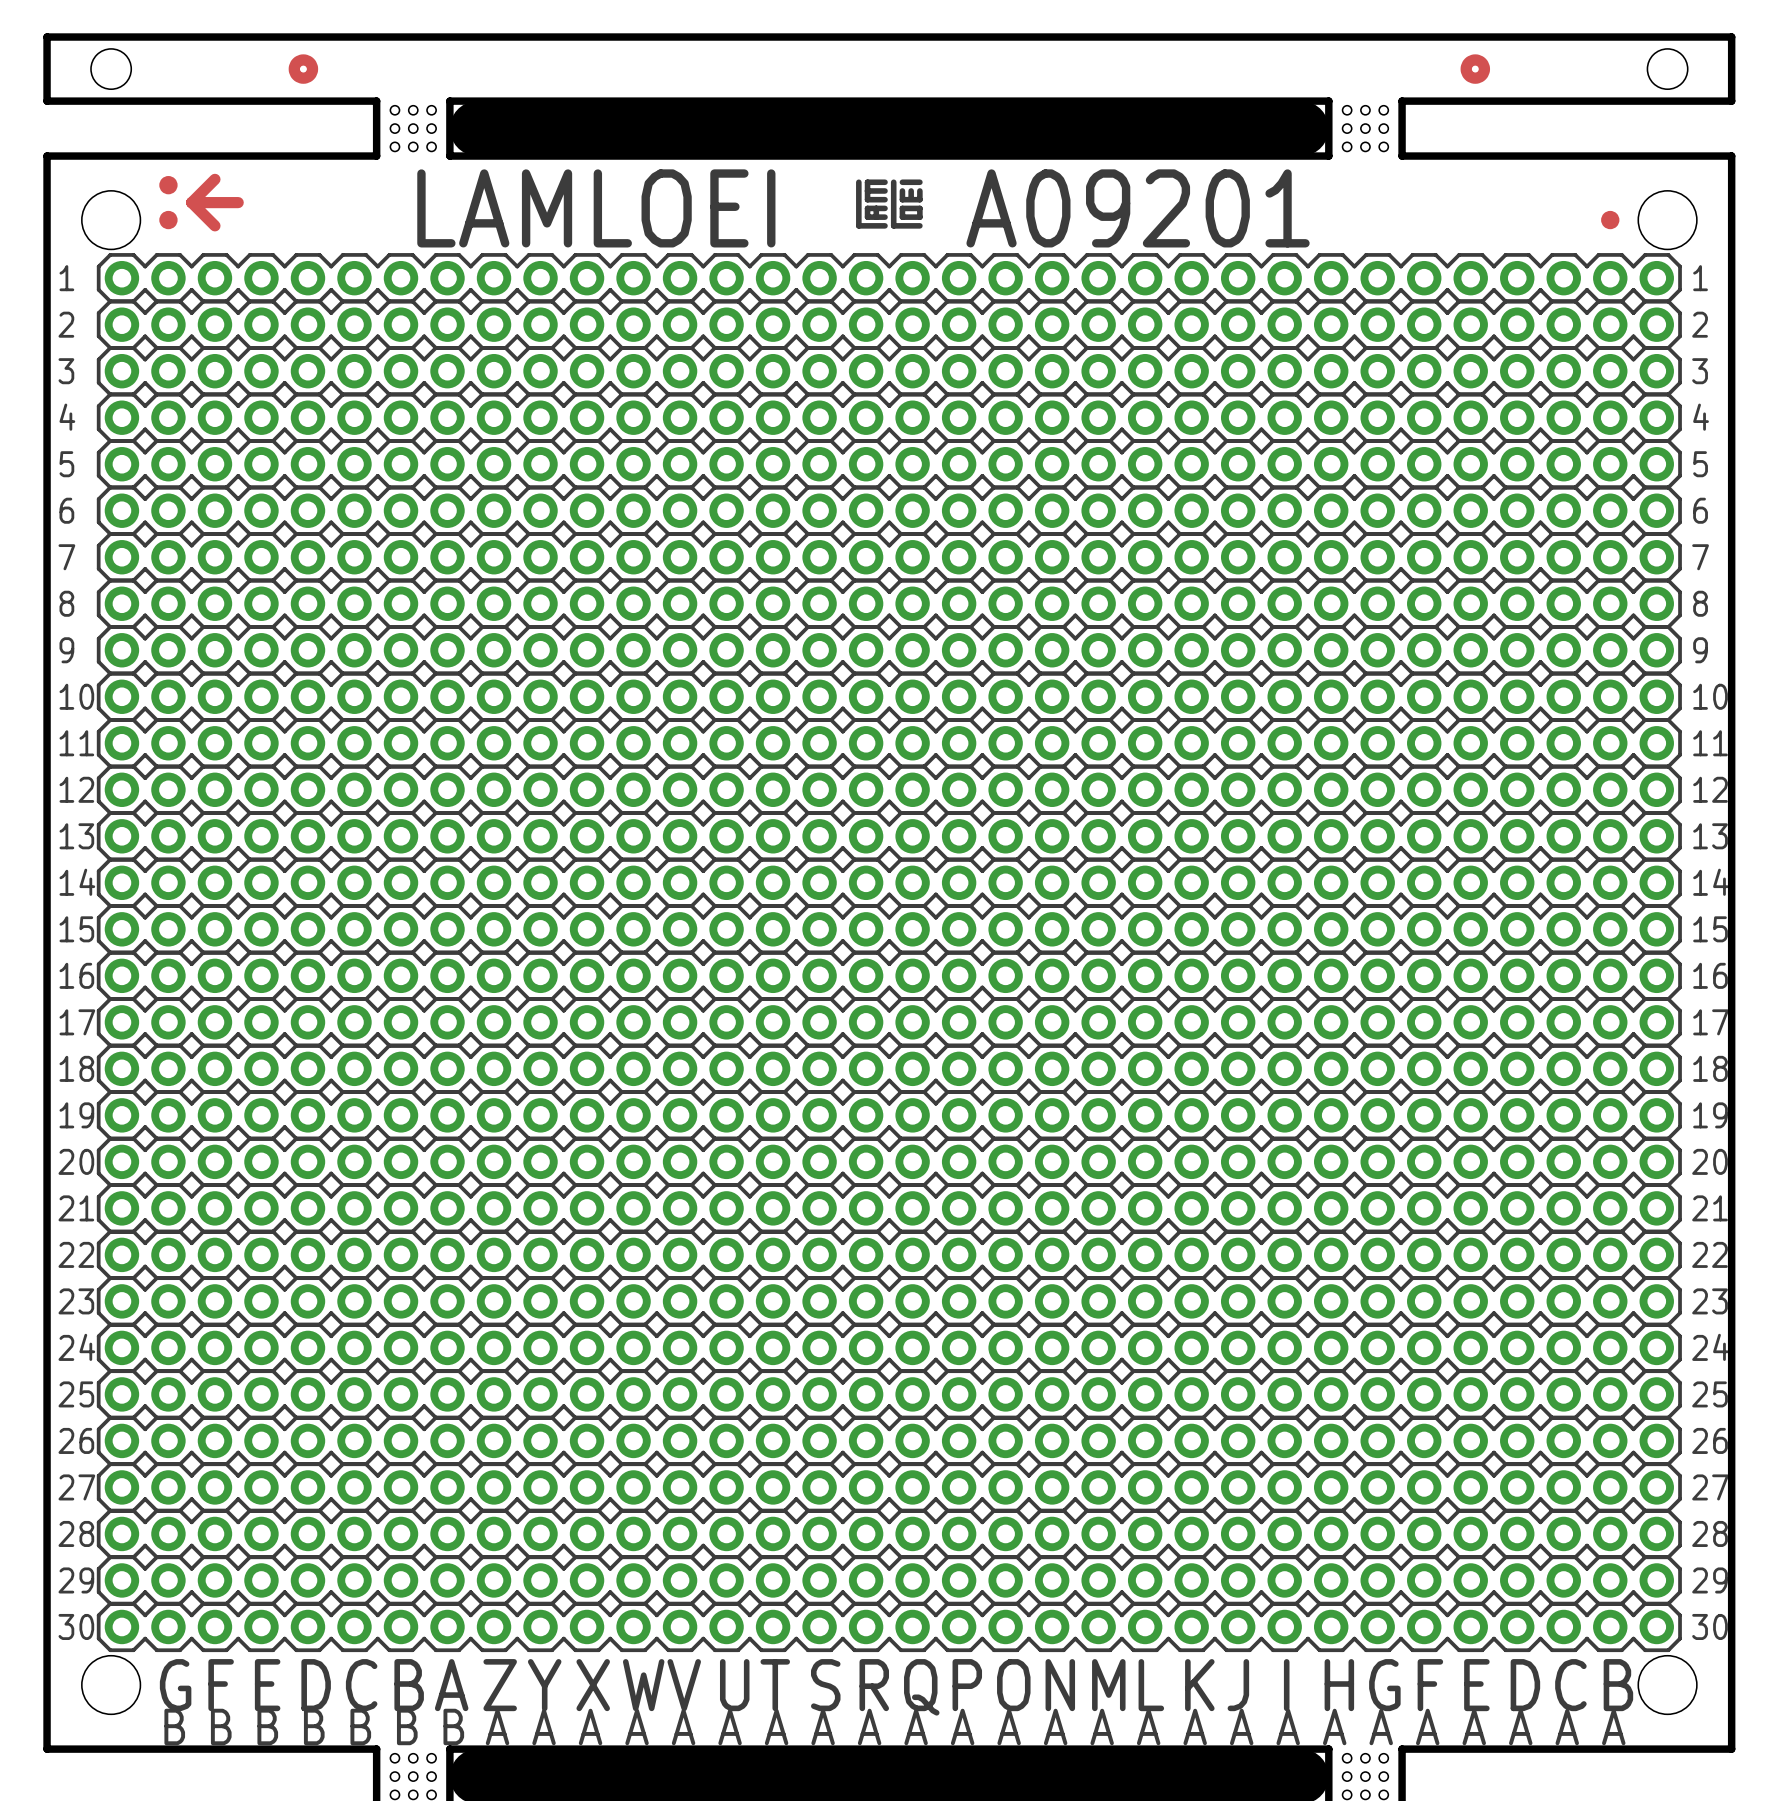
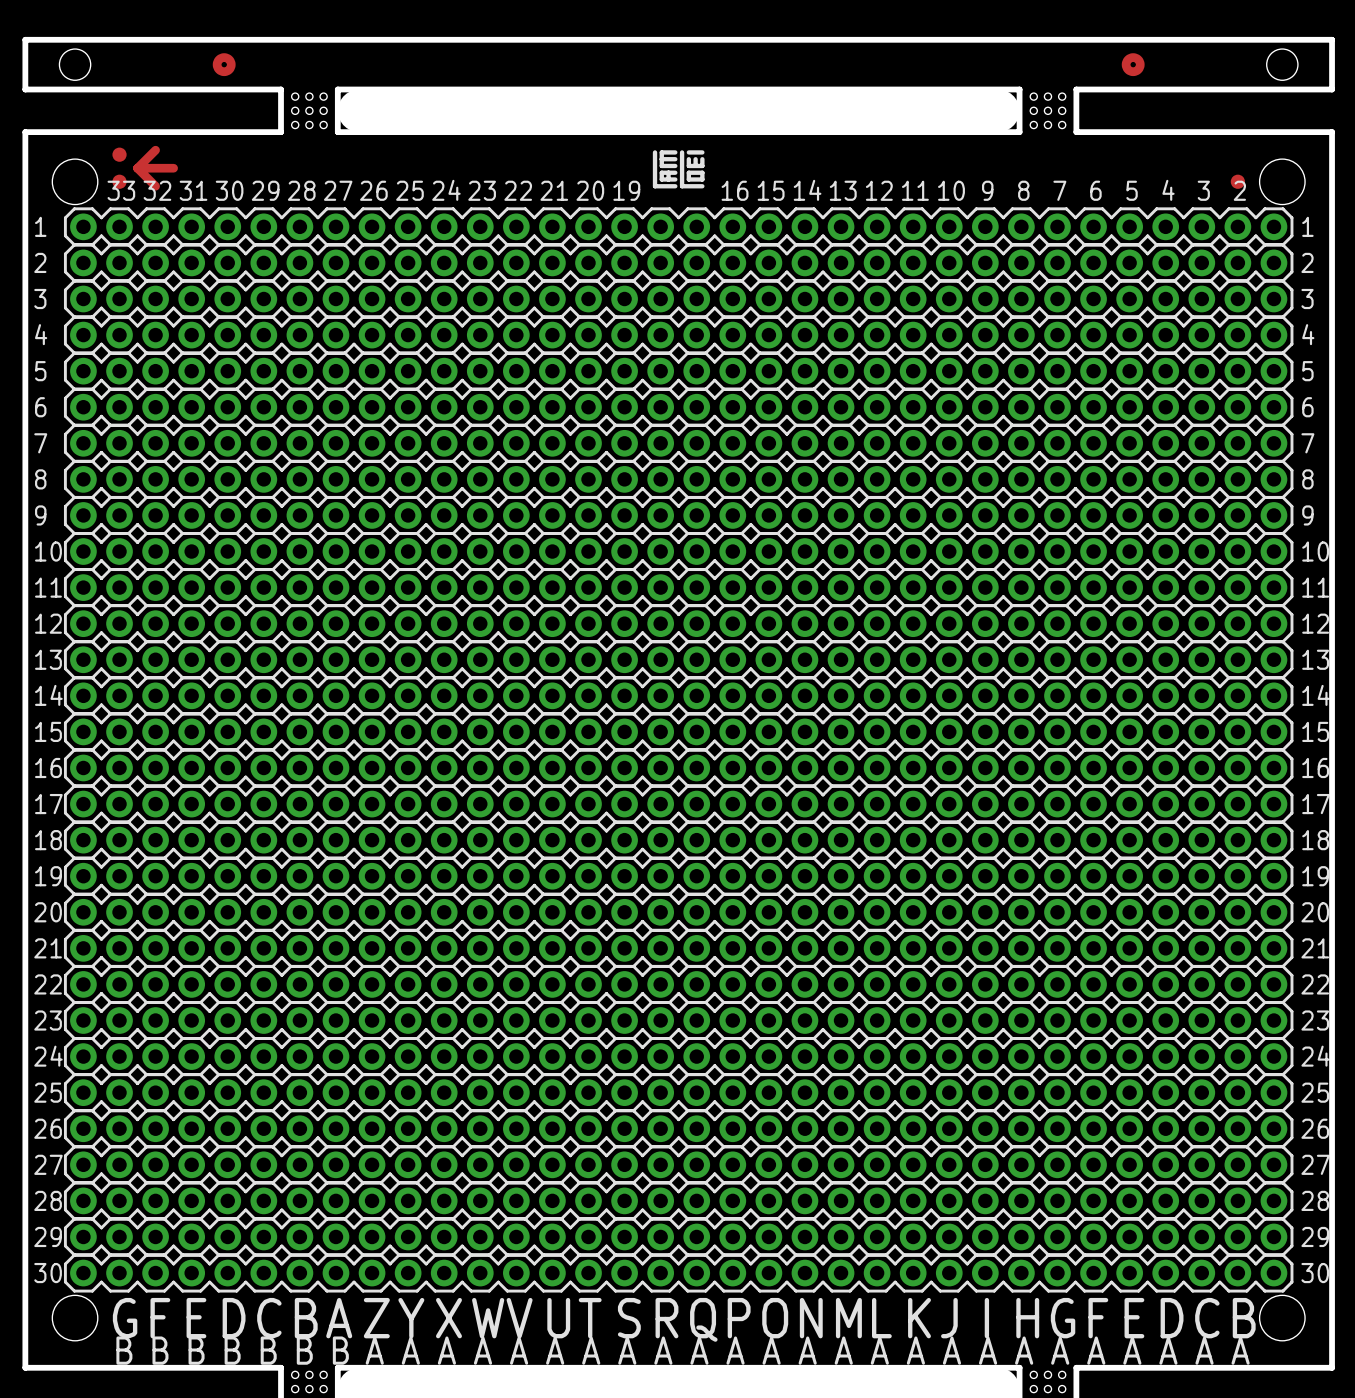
text: LAMLOEI (596, 208) -> none
text: A09201 (1138, 208) -> none
text: none -> 33 (121, 190)
text: none -> 32 (157, 190)
text: none -> 31 (193, 190)
text: none -> 30 (229, 190)
text: none -> 29 (265, 190)
text: none -> 28 (301, 190)
text: none -> 27 (338, 190)
text: none -> 26 (373, 190)
text: none -> 25 (409, 190)
text: none -> 24 (446, 190)
text: none -> 23 (482, 190)
text: none -> 22 (518, 190)
text: none -> 21 (554, 190)
text: none -> 20 (590, 190)
text: none -> 19 (626, 190)
text: none -> 16 (735, 190)
text: none -> 15 (771, 190)
text: none -> 14 (807, 190)
text: none -> 13 (843, 190)
text: none -> 12 (879, 190)
text: none -> 11 (915, 190)
text: none -> 10 (951, 190)
text: none -> 9 (987, 190)
text: none -> 8 (1023, 190)
text: none -> 7 (1059, 190)
text: none -> 6 (1095, 190)
text: none -> 5 (1132, 190)
text: none -> 4 (1168, 190)
text: none -> 3 (1203, 190)
text: none -> 2 (1239, 190)

